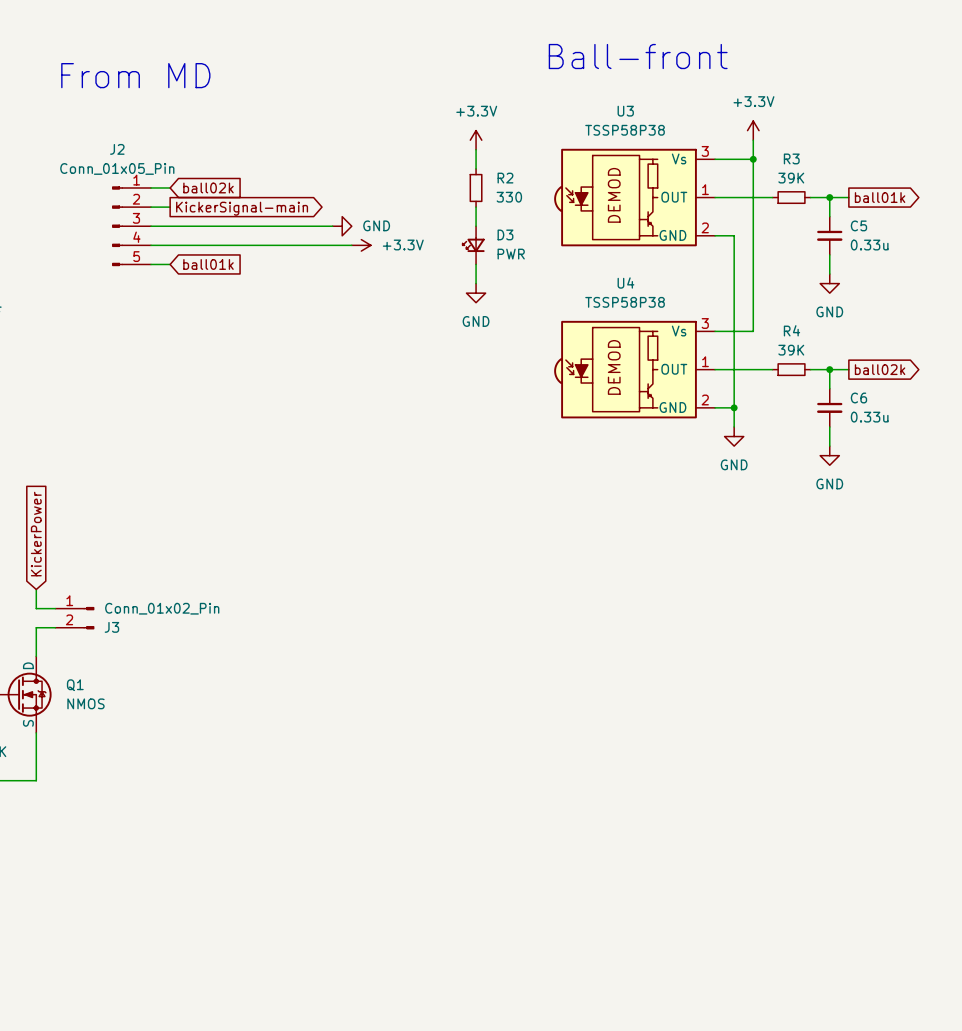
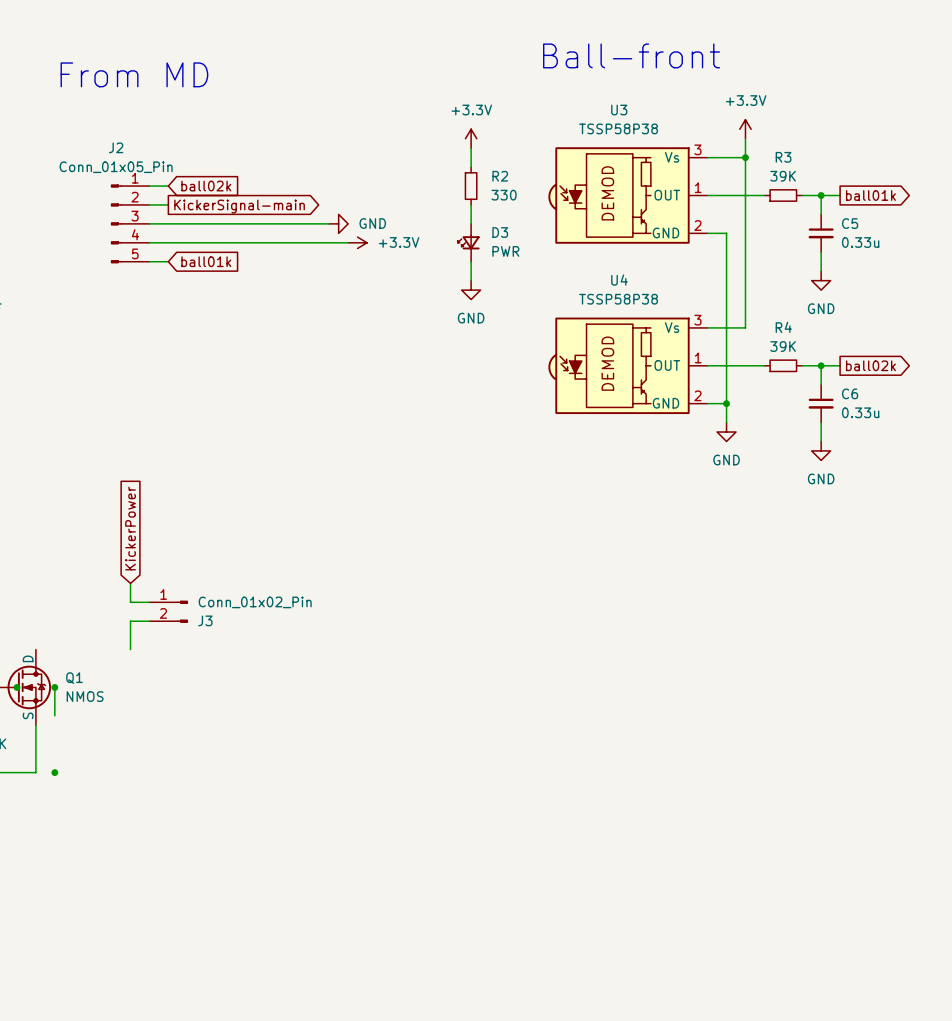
global label position: KickerPower (36, 534) -> KickerPower (130, 528)
wire: (36, 589) (36, 608) (55, 608) -> (130, 583) (130, 602) (149, 602)
J3 position: (74, 618) -> (168, 611)
wire: (55, 627) (36, 627) (36, 656) -> (149, 621) (130, 621) (130, 649)
junction: none -> (17, 687)
wire: none -> (54, 687) (54, 715)
junction: none -> (54, 687)
junction: none -> (54, 772)

